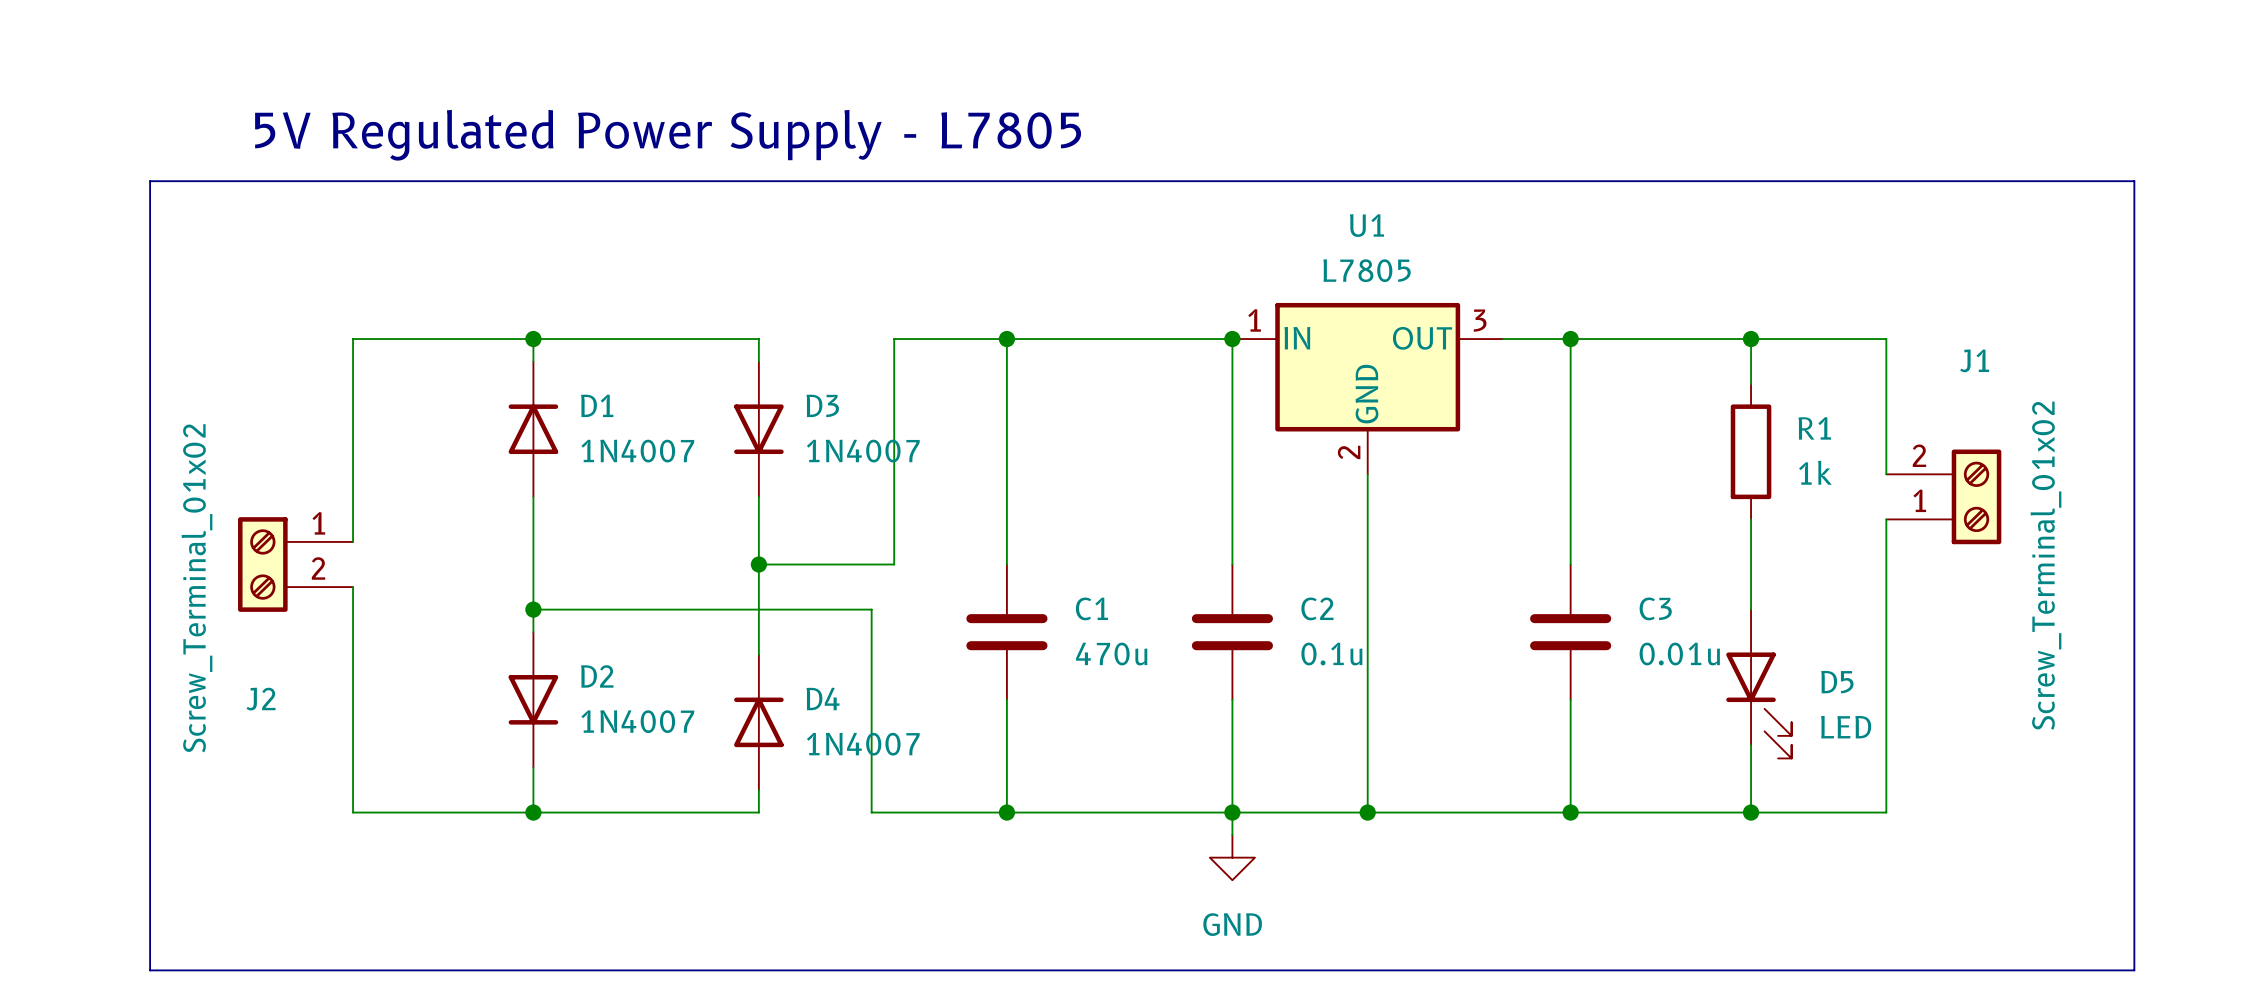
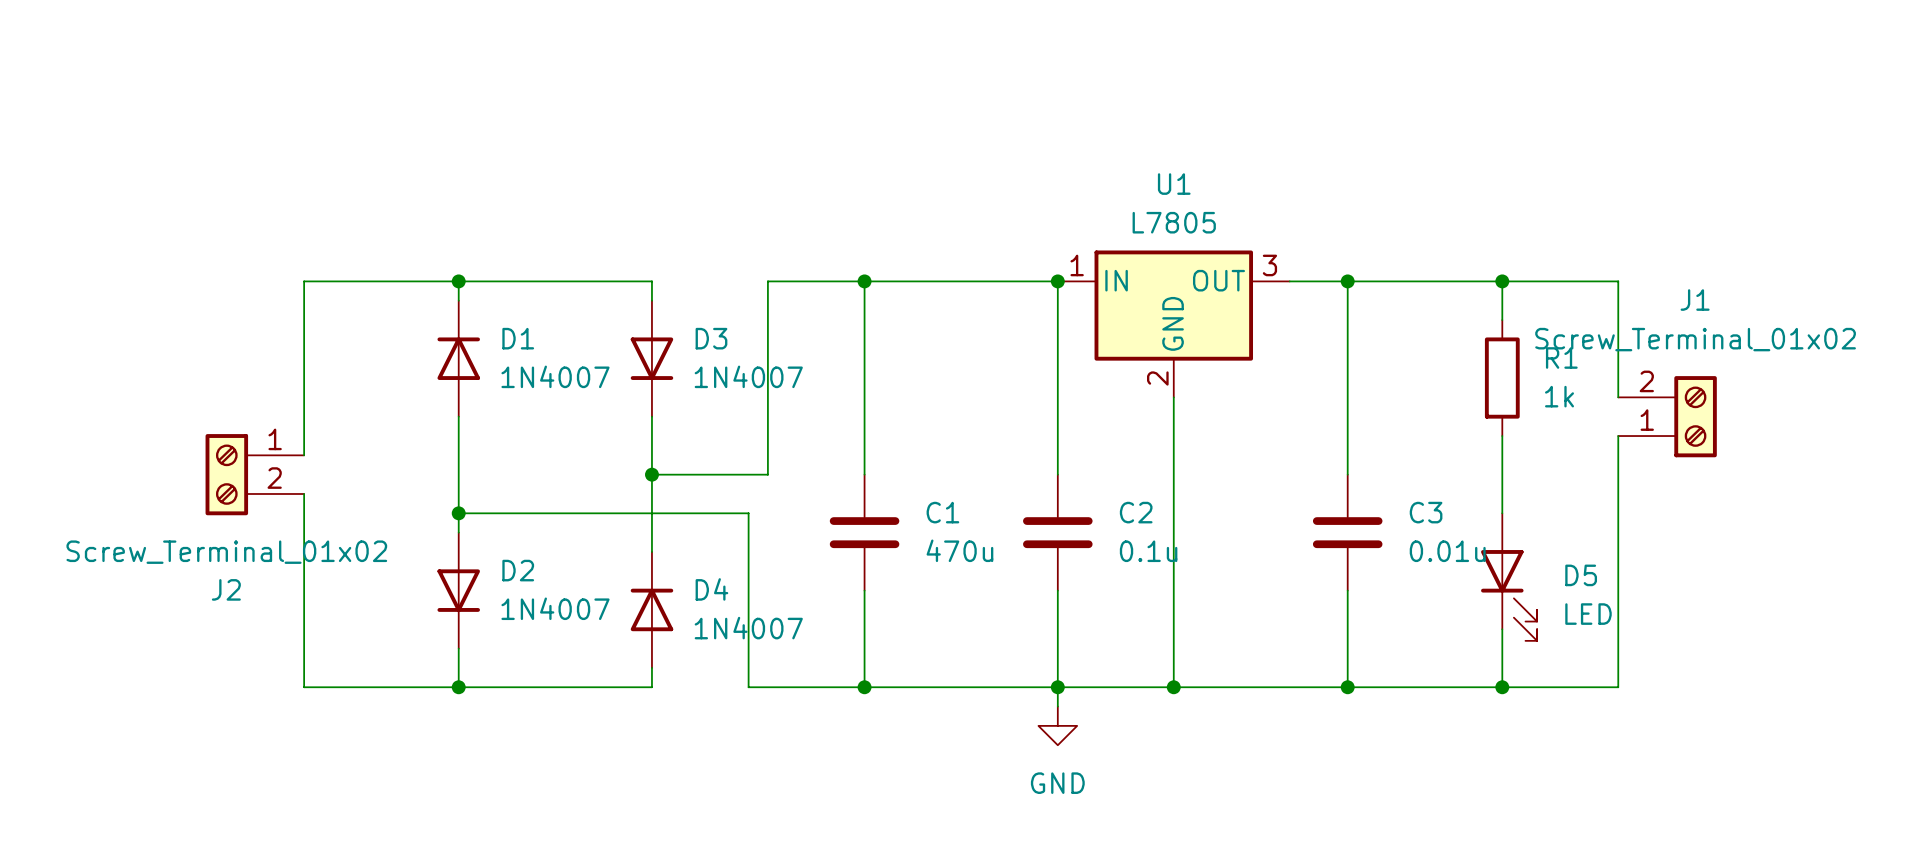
text: 5V Regulated Power Supply - L7805 (668, 135) -> none
line: (150, 181) (2134, 181) (2134, 970) (150, 970) (150, 181) -> none
J1 value rotation: 0° (2045, 565) -> 90° clockwise (1695, 339)
J2 value rotation: 0° (196, 588) -> 90° clockwise (226, 552)

